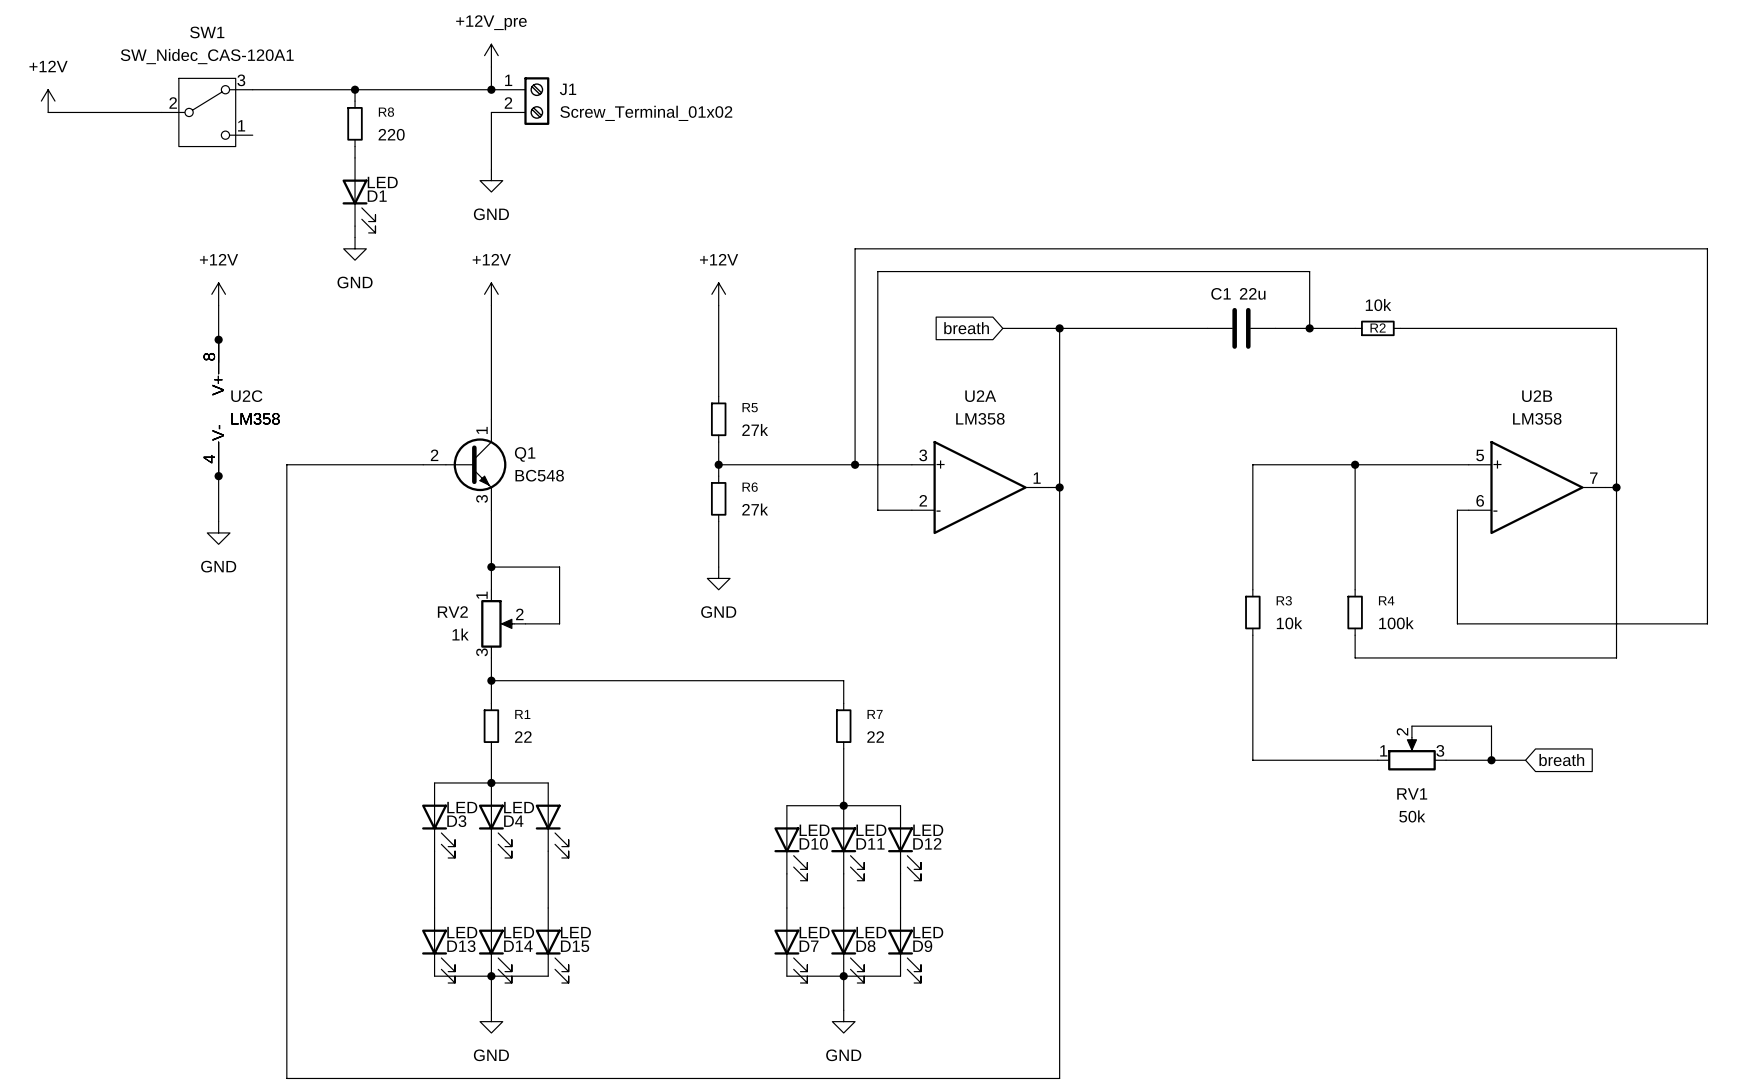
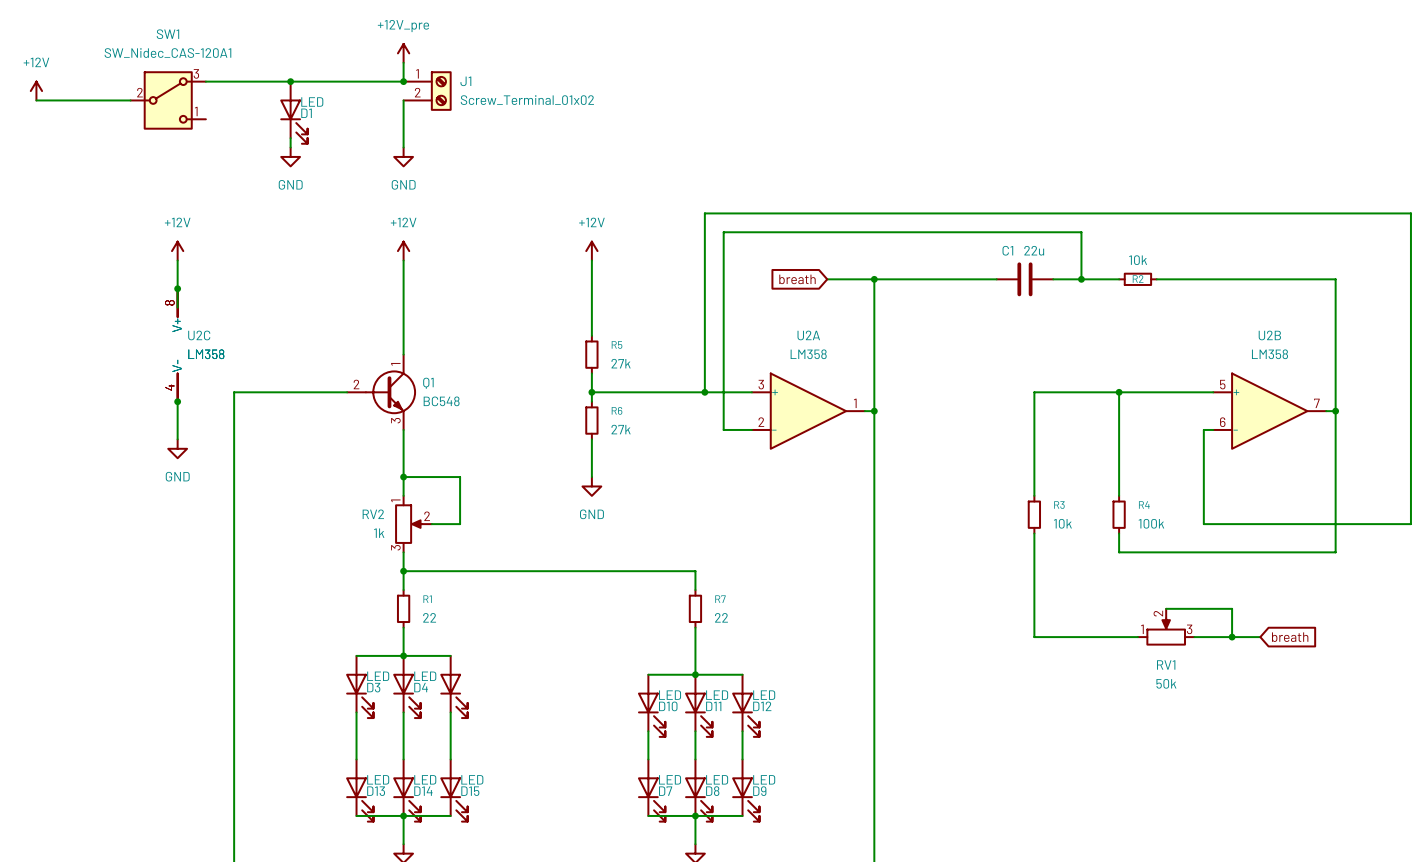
R8: 220 (355, 123) -> none
D1 position: (359, 195) -> (293, 112)
wire: (355, 226) (355, 237) -> none
power symbol position: GND (355, 248) -> GND (290, 156)

